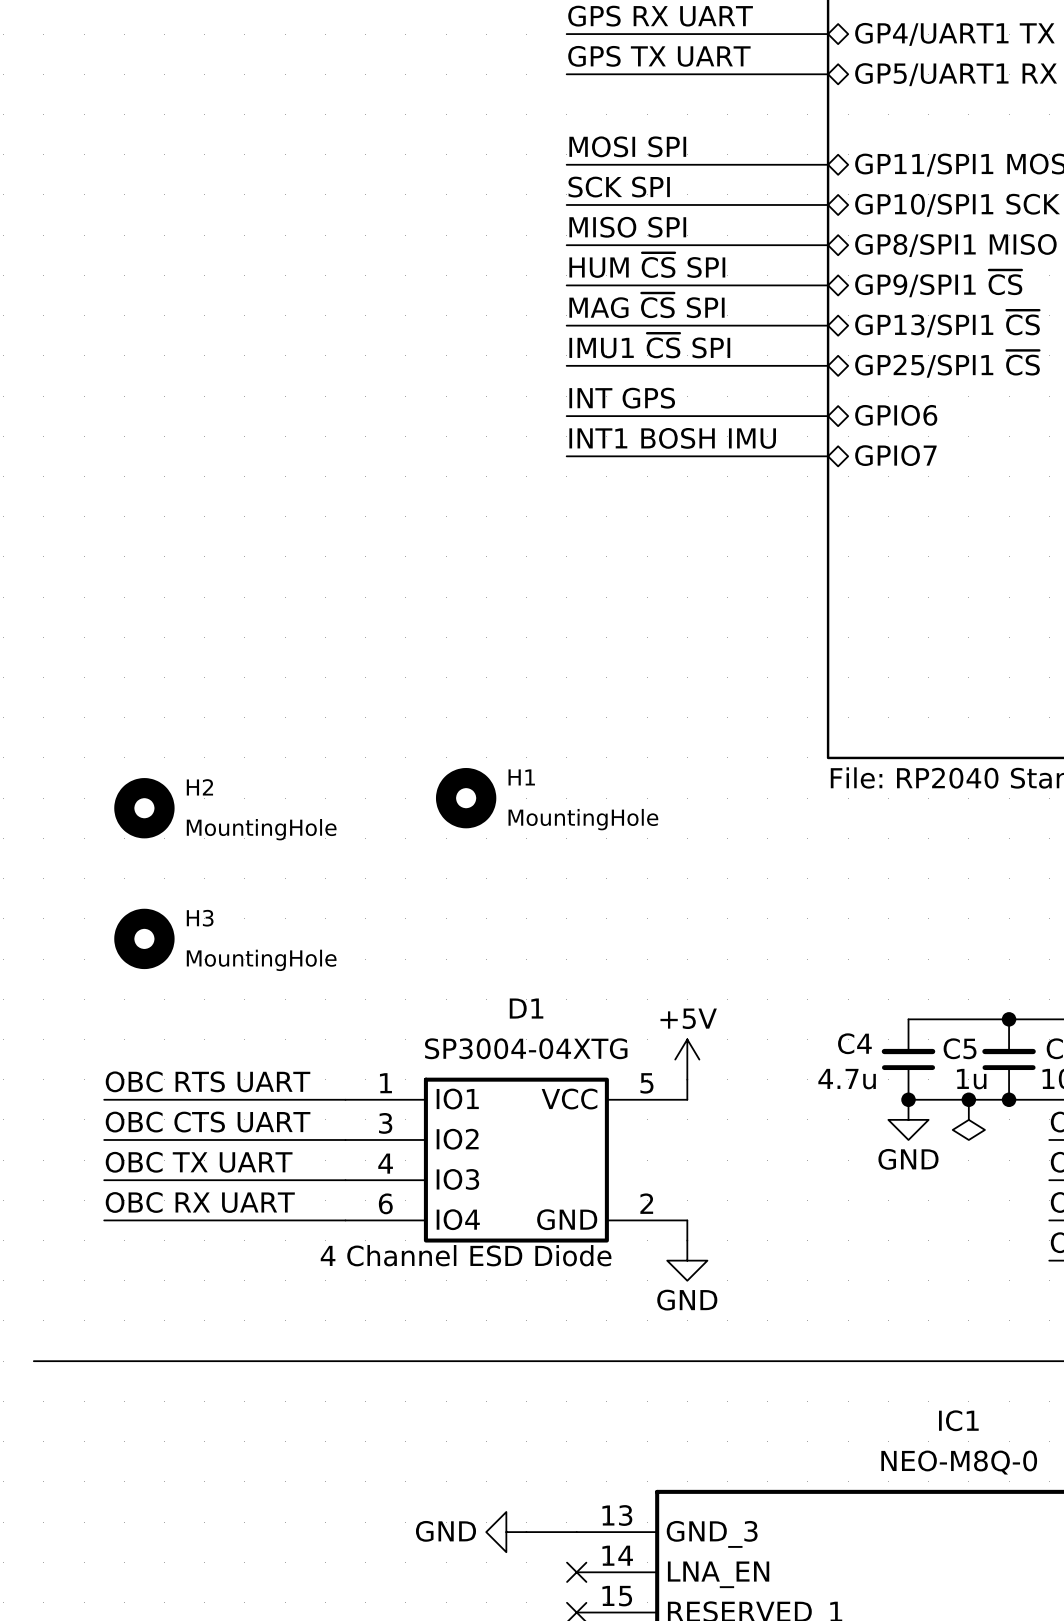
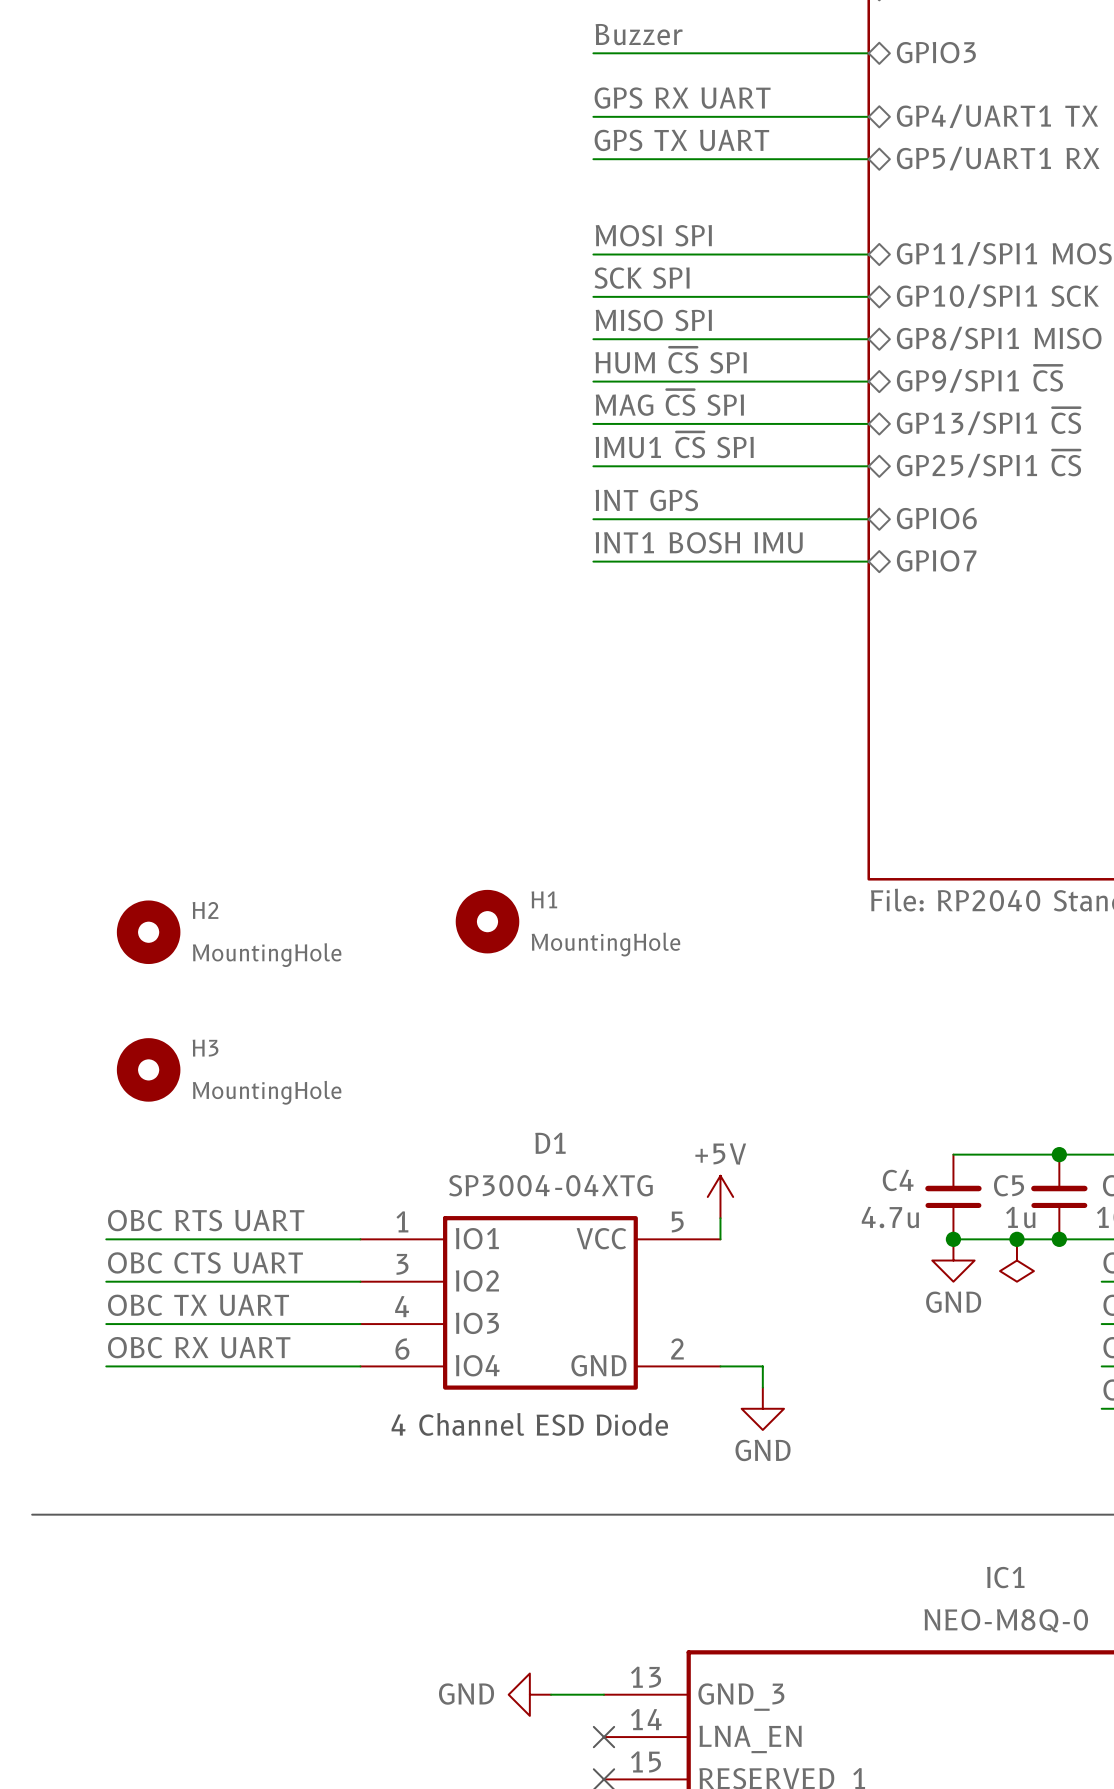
wire: (687, 1220) (687, 1240) -> (720, 1366) (762, 1366) (762, 1387)
text position: 4 Channel ESD Diode (466, 1255) -> 4 Channel ESD Diode (529, 1424)
power symbol position: GND (687, 1260) -> GND (762, 1408)

